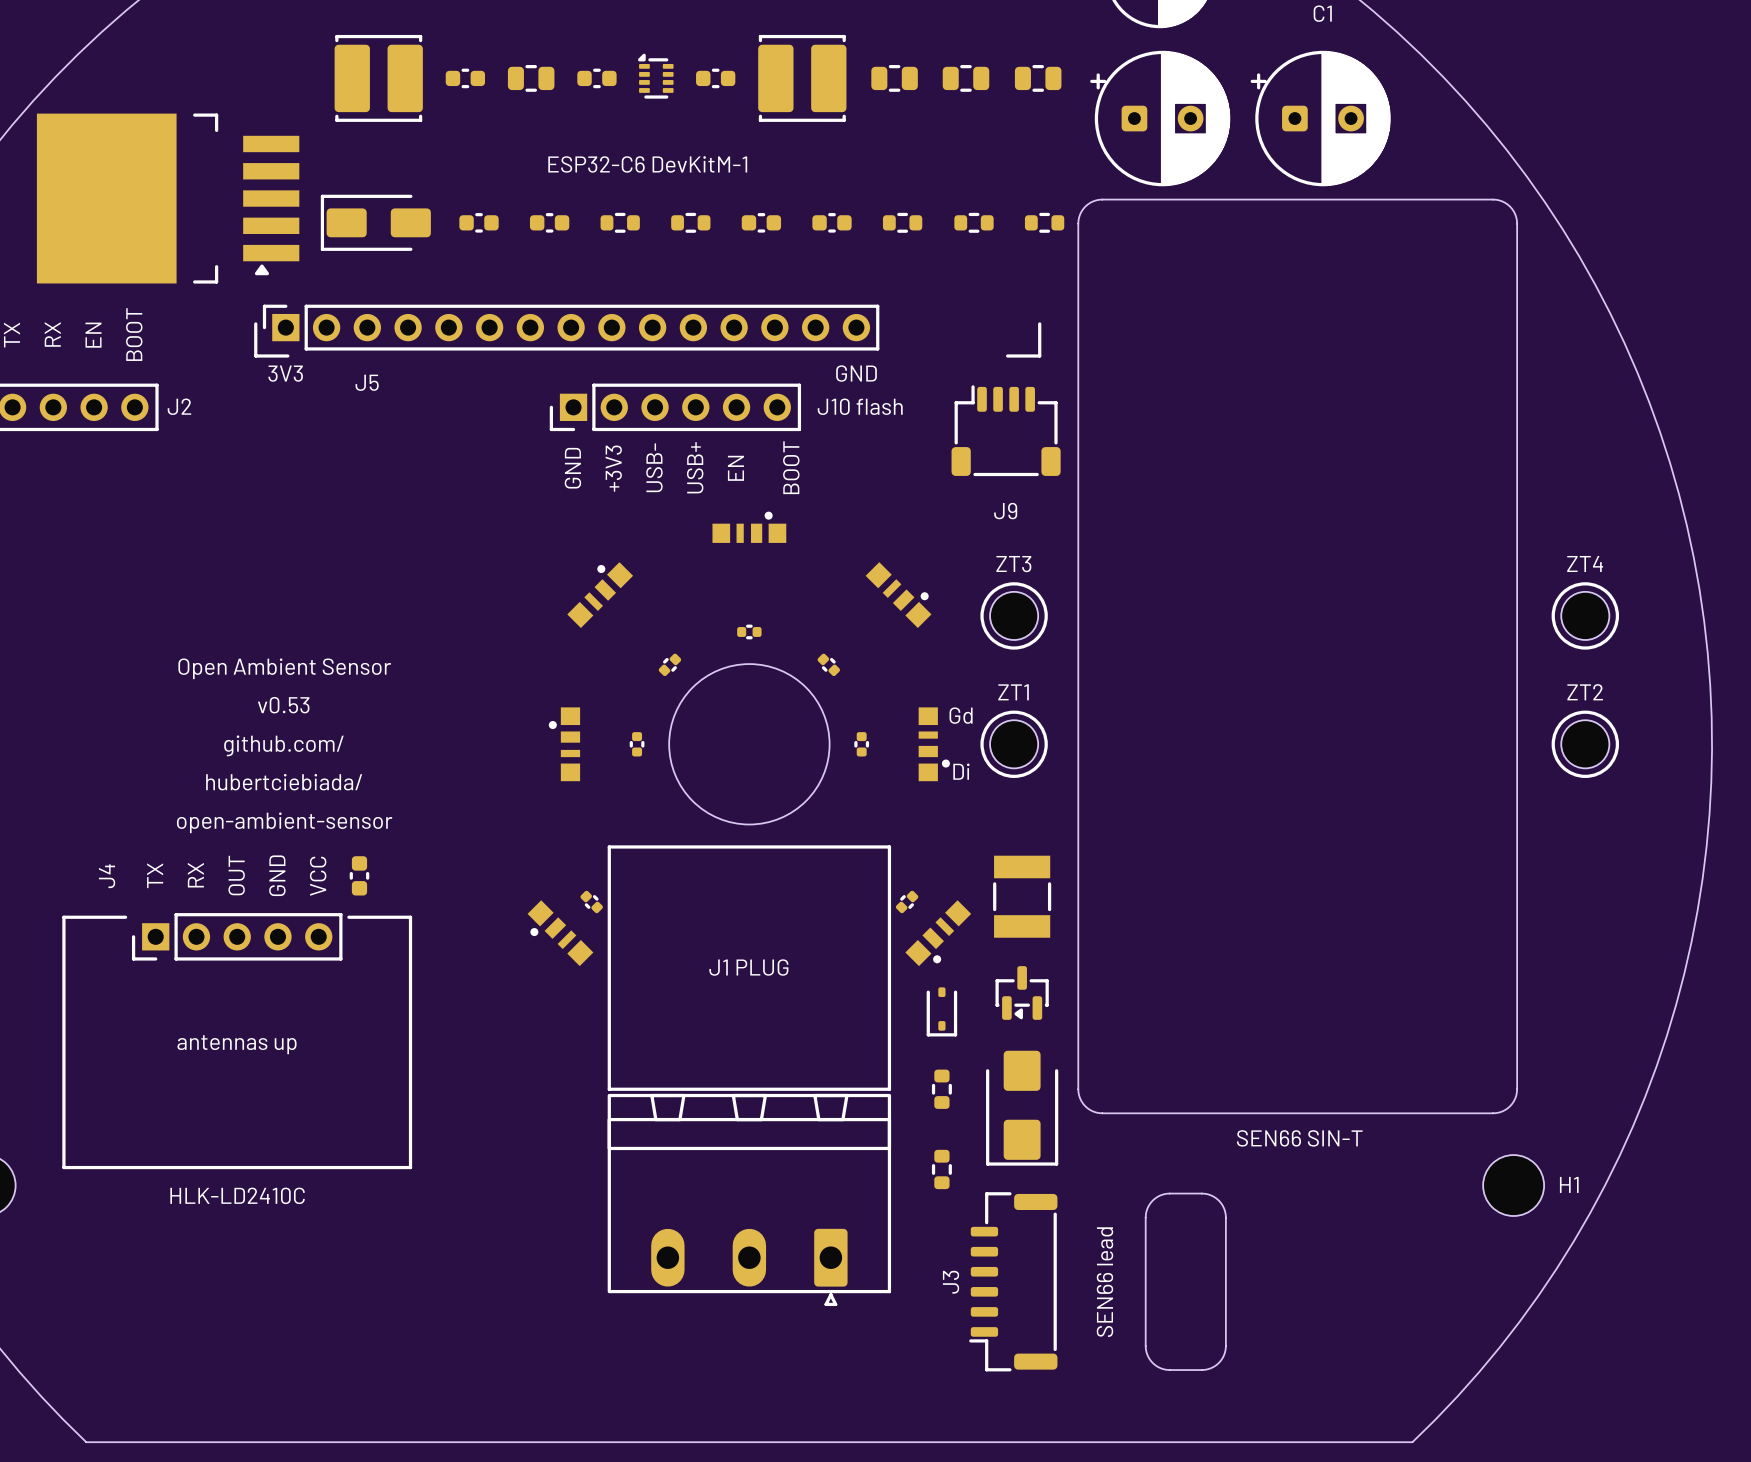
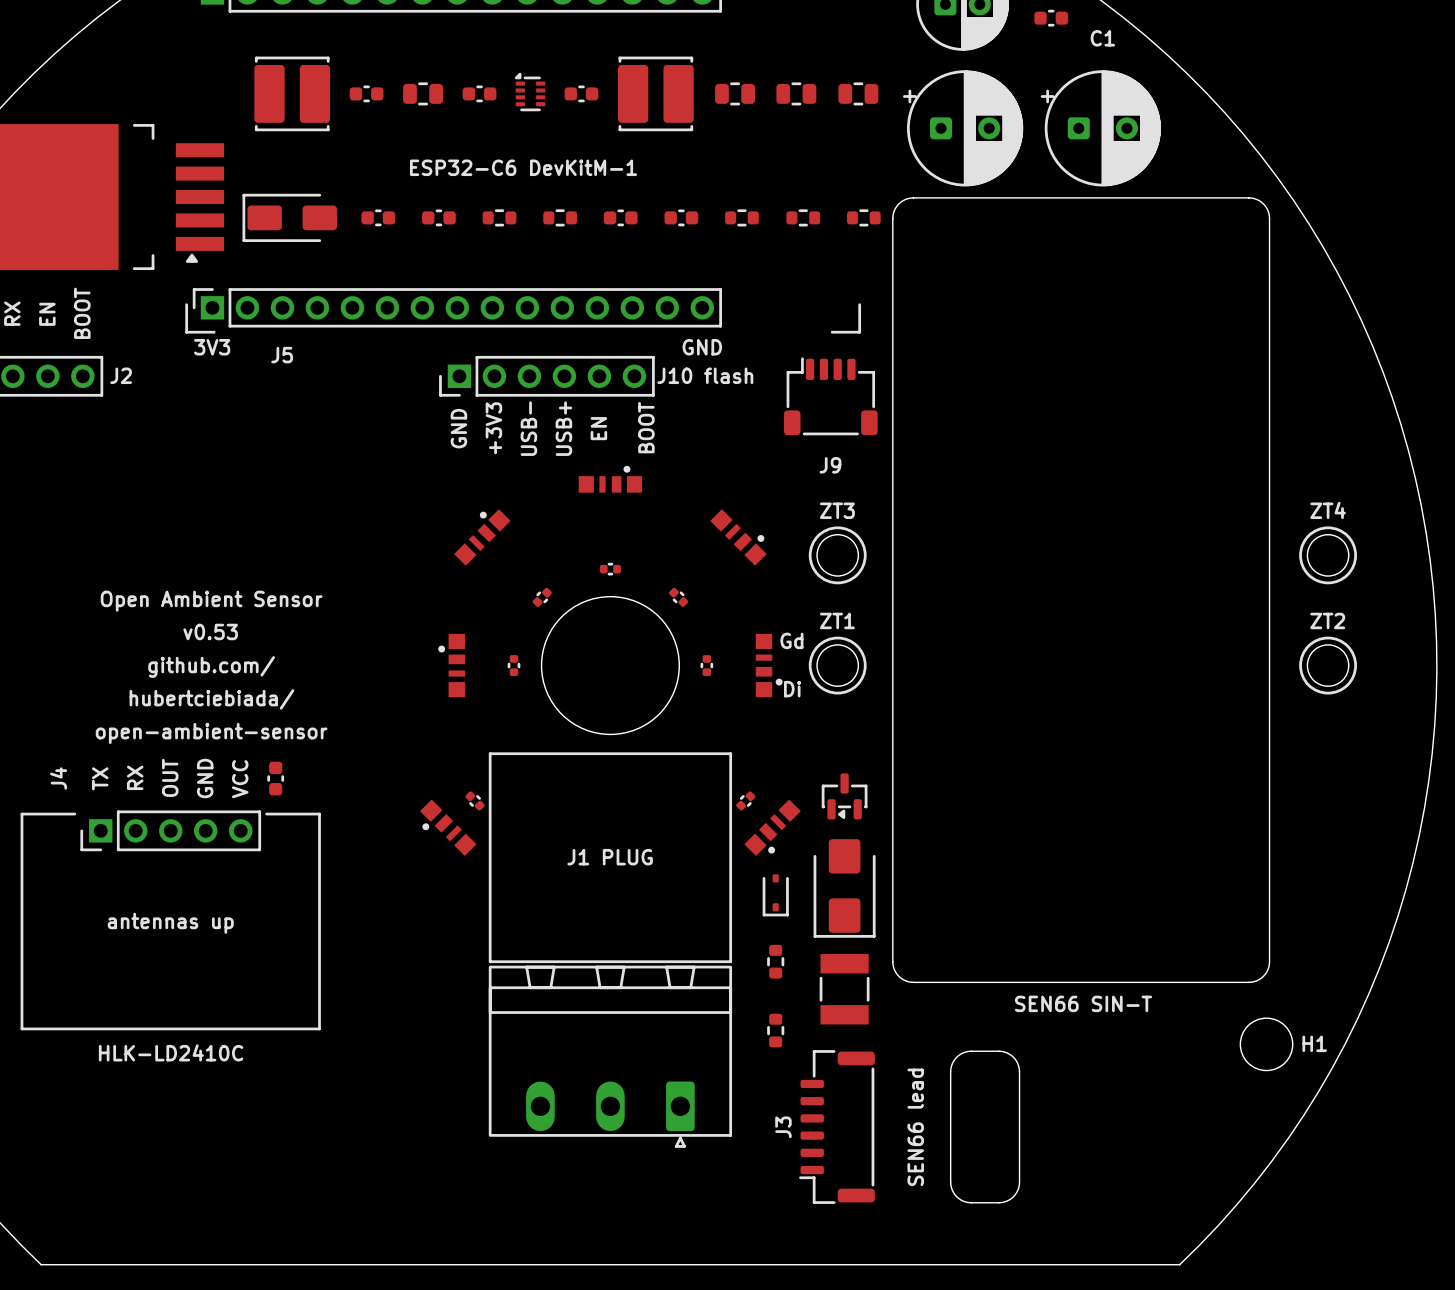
part footprint: [993, 855, 1052, 938] -> [821, 773, 868, 820]
part footprint: [995, 966, 1049, 1020] -> [813, 839, 876, 938]
part footprint: [986, 1050, 1059, 1166] -> [819, 954, 870, 1025]

